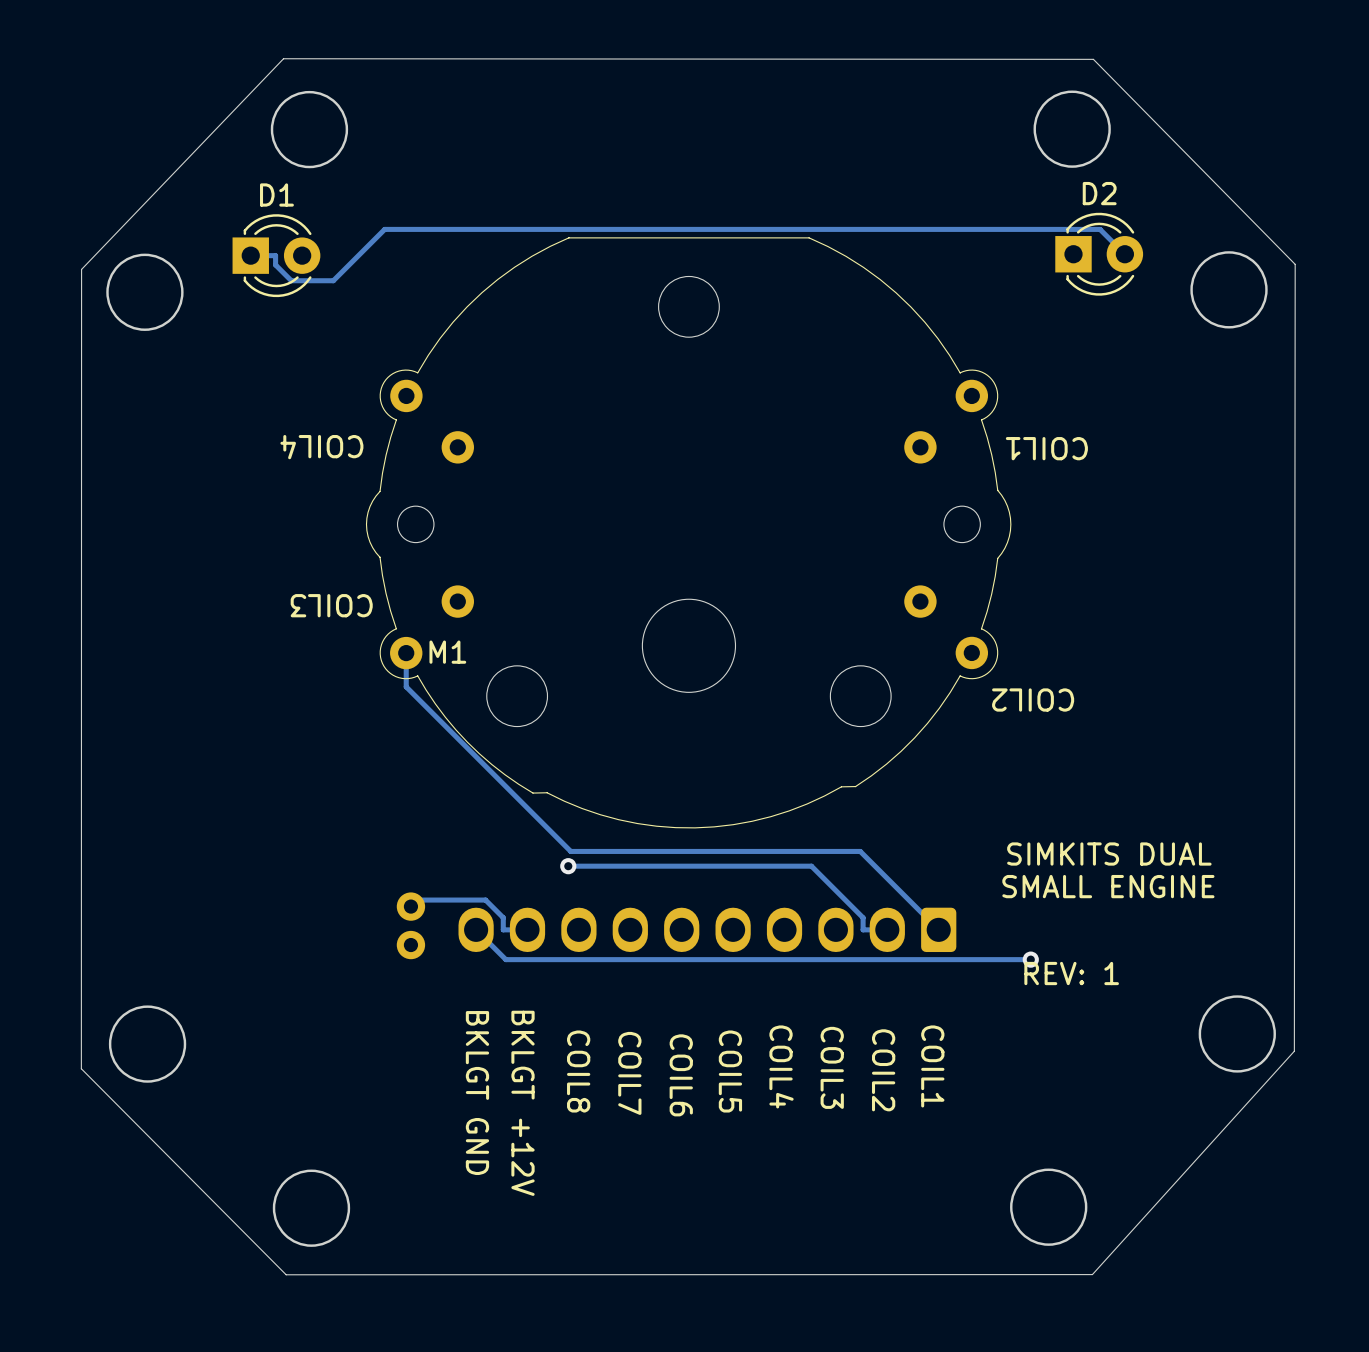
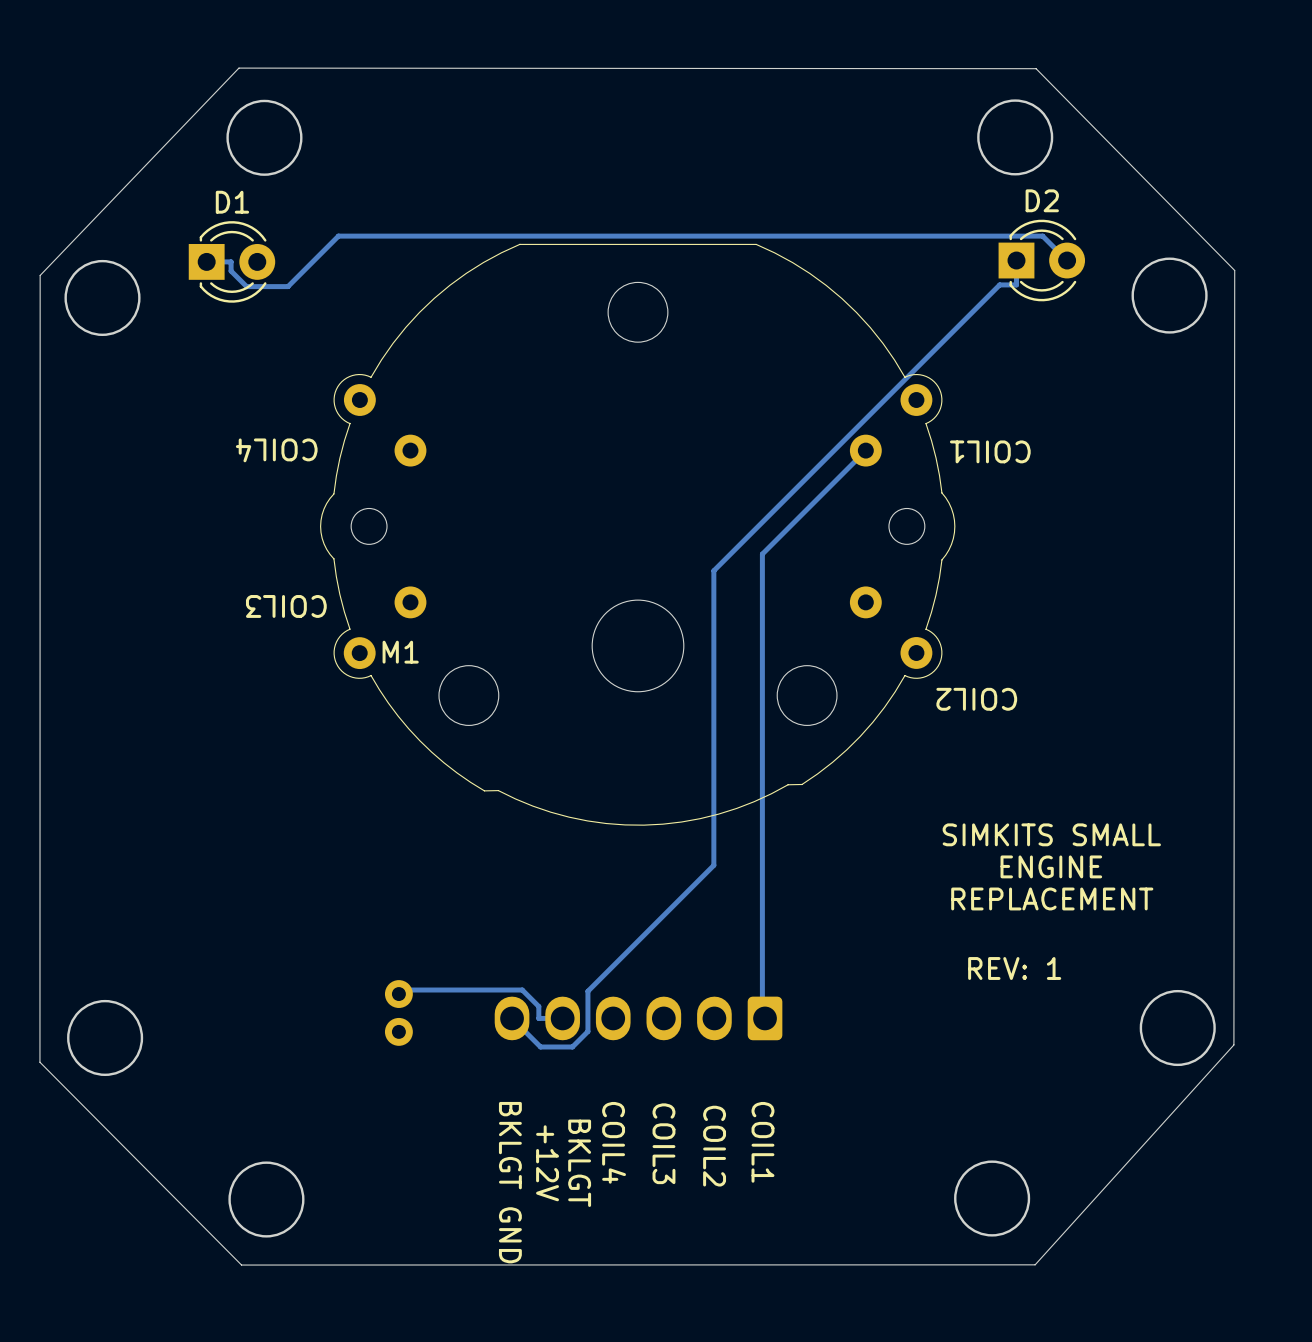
track: none -> (1016, 260) (1016, 284) (999, 284) (713, 570) (713, 865) (587, 991) (587, 1031) (572, 1046) (540, 1046) (512, 1018)
track: none -> (865, 450) (762, 554) (762, 1015) (765, 1018)
track: (406, 653) (406, 686) (570, 851) (860, 851) (938, 929) -> none
text: SIMKITS DUAL (1109, 854) -> SIMKITS SMALL (1051, 834)
track: (568, 866) (811, 866) (863, 917) (863, 929) (887, 929) -> none
via: (568, 866) -> none
text: SMALL ENGINE (1108, 886) -> ENGINE (1051, 866)
text: none -> REPLACEMENT (1052, 898)
track: (410, 906) (417, 900) (485, 900) (503, 917) (503, 929) (527, 929) -> none
part position: (410, 925) -> (398, 1012)
track: (476, 929) (505, 959) (1030, 959) -> none
part: (707, 929) -> none
via: (1030, 959) -> none
track: none -> (398, 994) (402, 990) (522, 990) (538, 1006) (538, 1018) (562, 1018)
part: none -> (638, 1018)
text position: COIL4 (781, 1066) -> COIL4 (614, 1142)
text position: COIL1 (932, 1066) -> COIL1 (762, 1142)
text position: COIL3 (832, 1067) -> COIL3 (663, 1143)
text position: COIL2 (883, 1070) -> COIL2 (714, 1146)
text: COIL8 (578, 1071) -> none
text: COIL5 (730, 1071) -> none
text: COIL7 (629, 1073) -> none
text: COIL6 (681, 1075) -> none
text position: BKLGT GND (477, 1093) -> BKLGT GND (510, 1182)
text: BKLGT +12V (523, 1103) -> none
text: none -> +12V (547, 1163)
text: none -> BKLGT (579, 1163)

